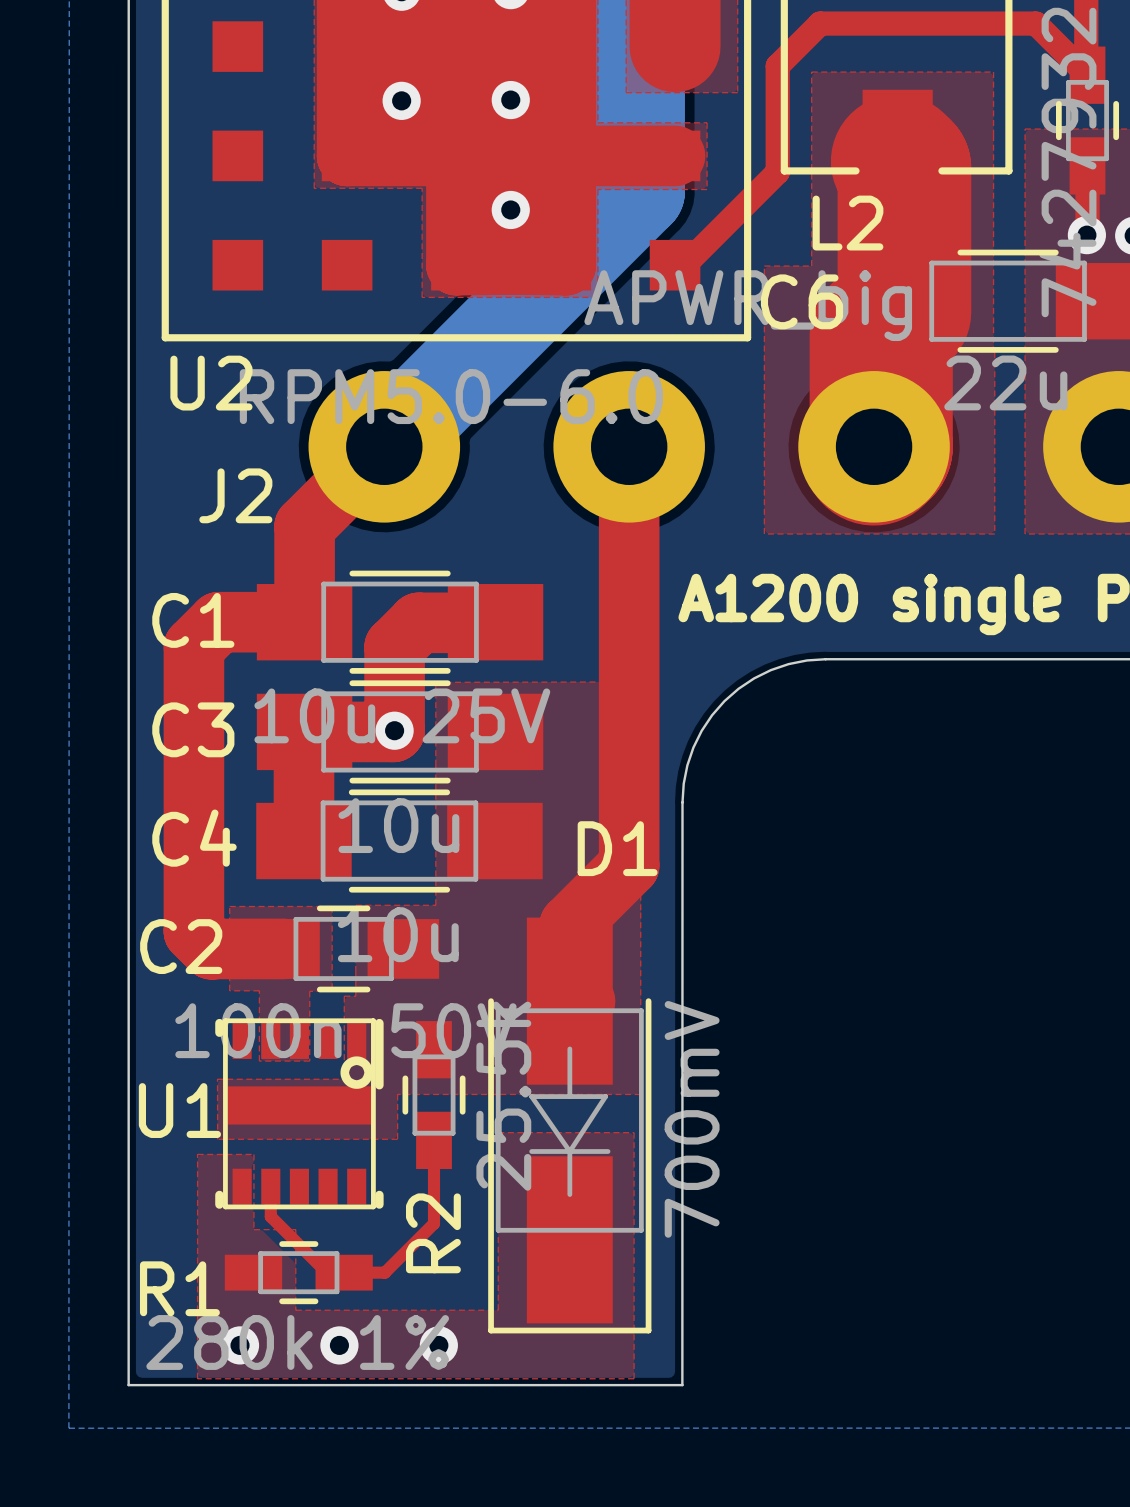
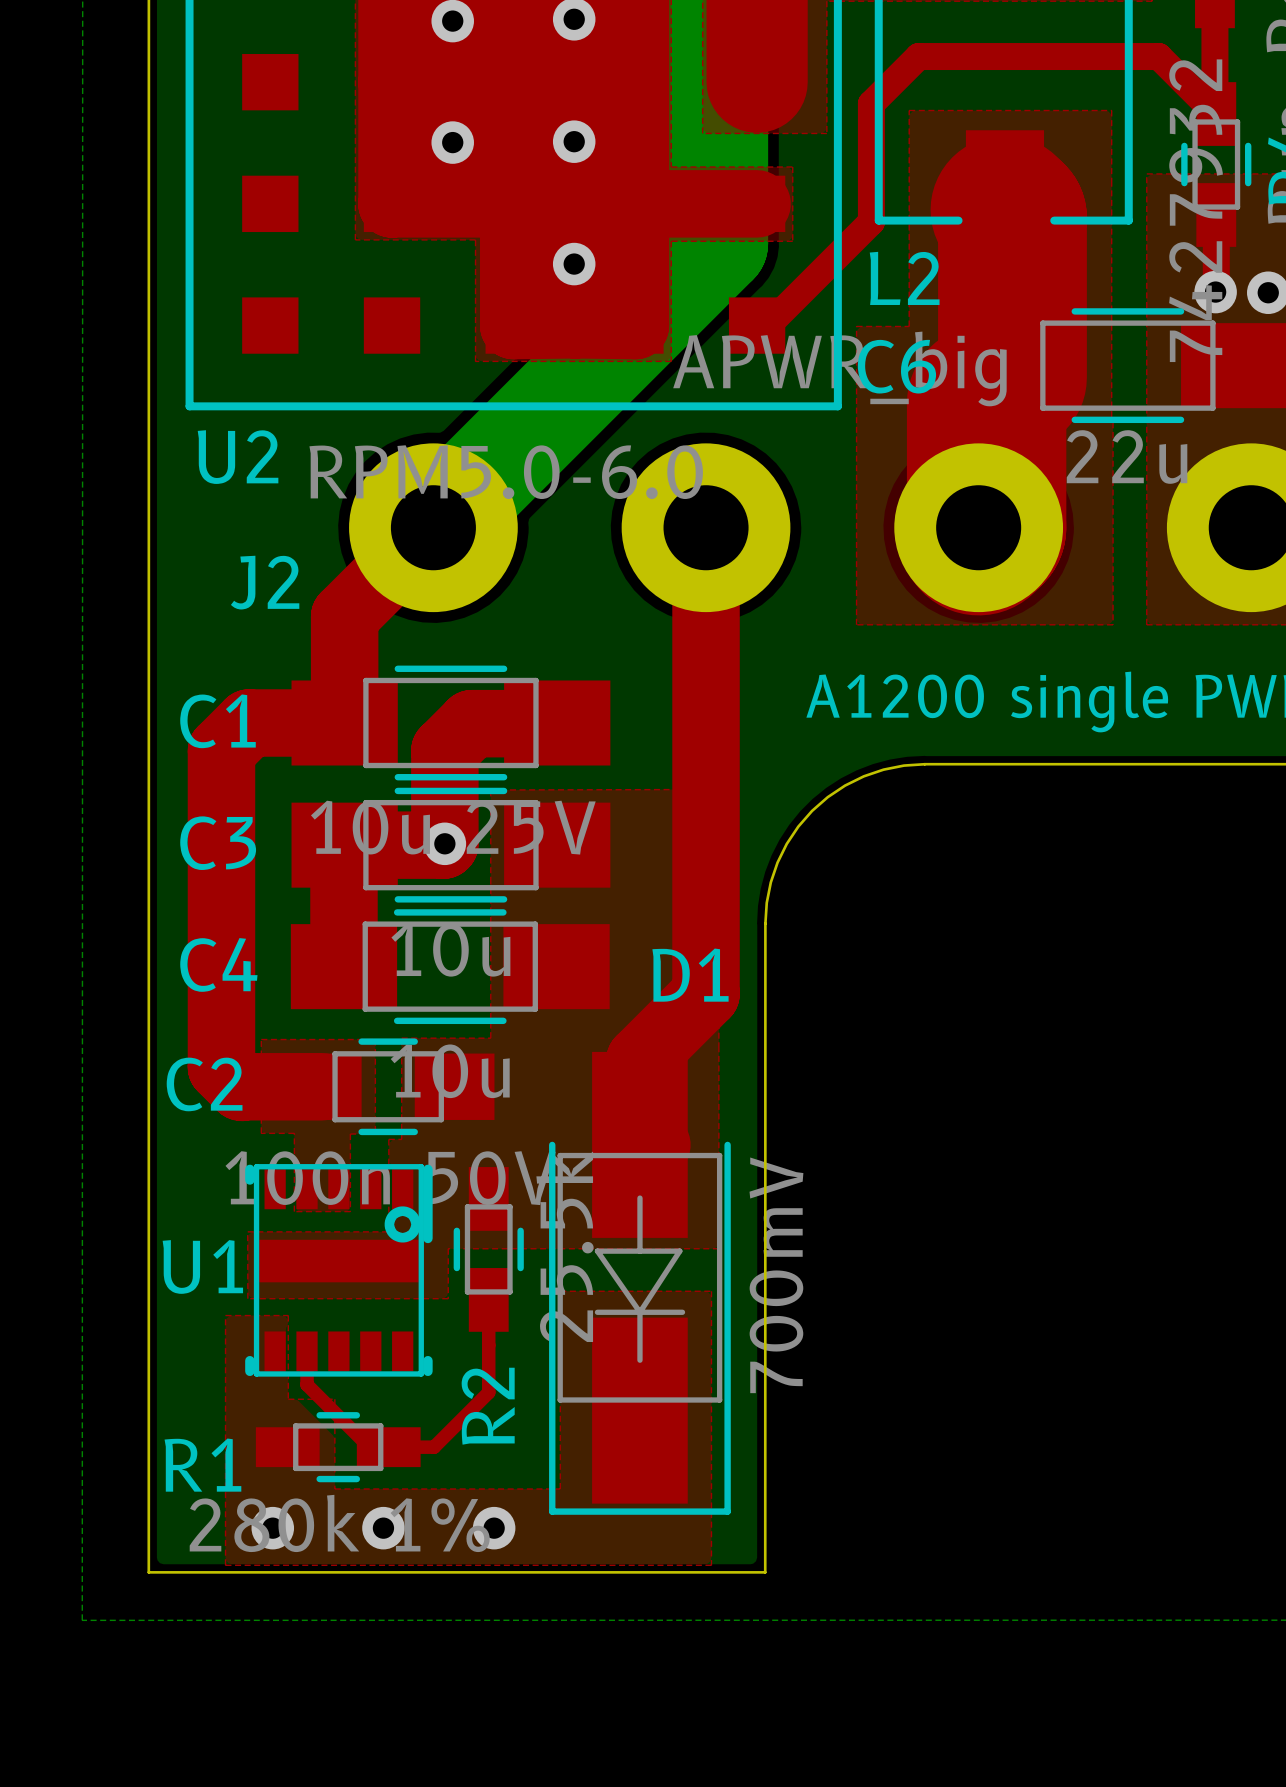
L2 name position: L2 (847, 223) -> L2 (904, 278)

